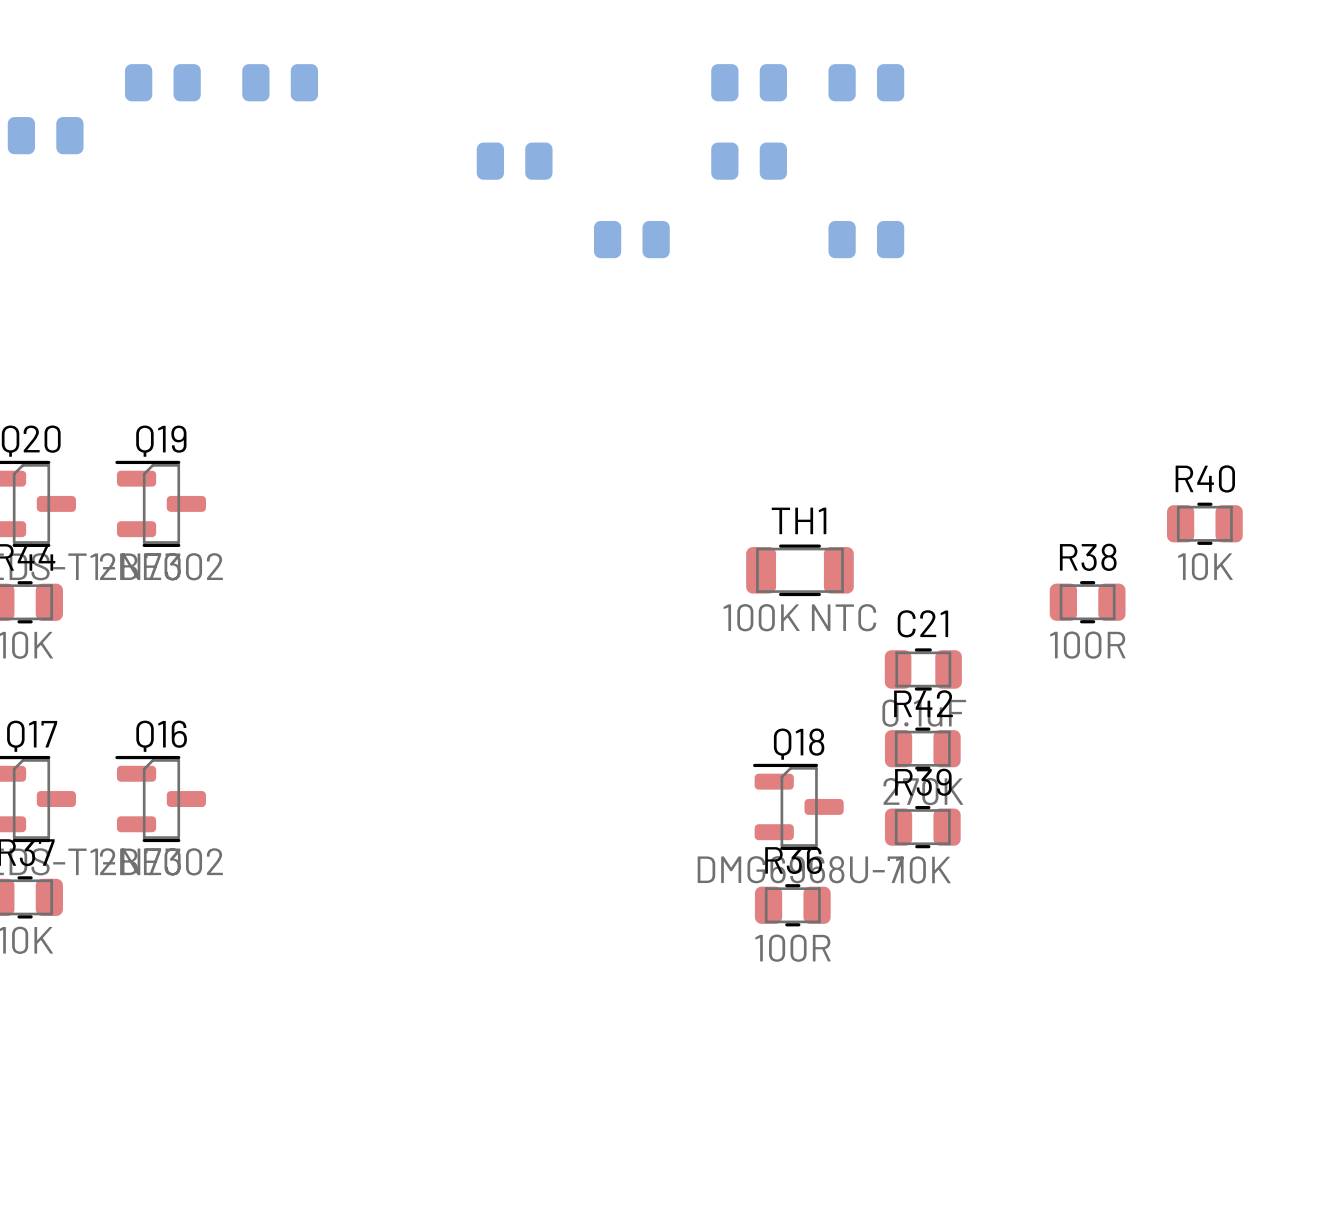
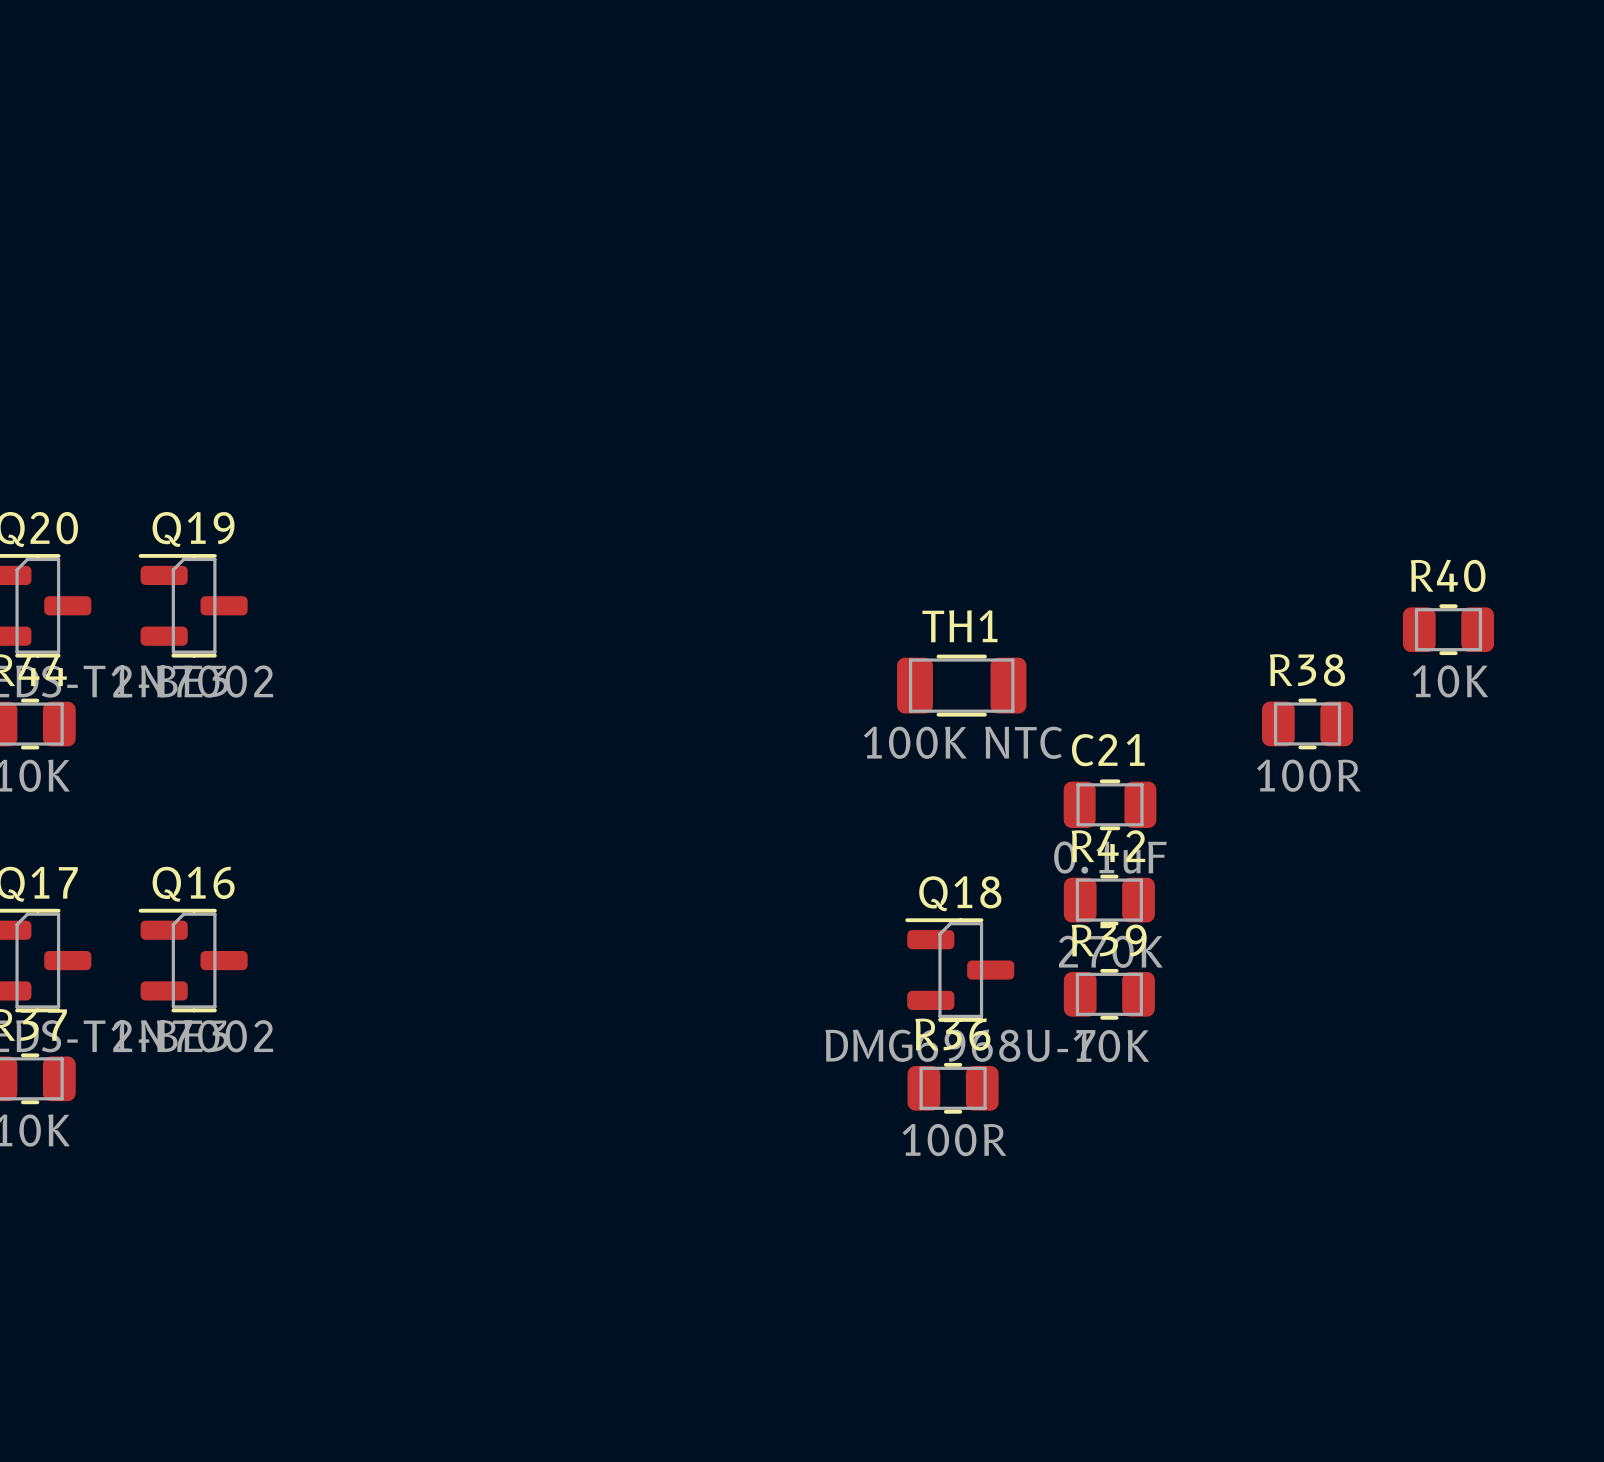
part: (162, 82) -> none
part: (280, 82) -> none
part: (749, 82) -> none
part: (866, 82) -> none
part: (45, 135) -> none
part: (514, 161) -> none
part: (749, 161) -> none
part: (631, 239) -> none
part: (866, 239) -> none

